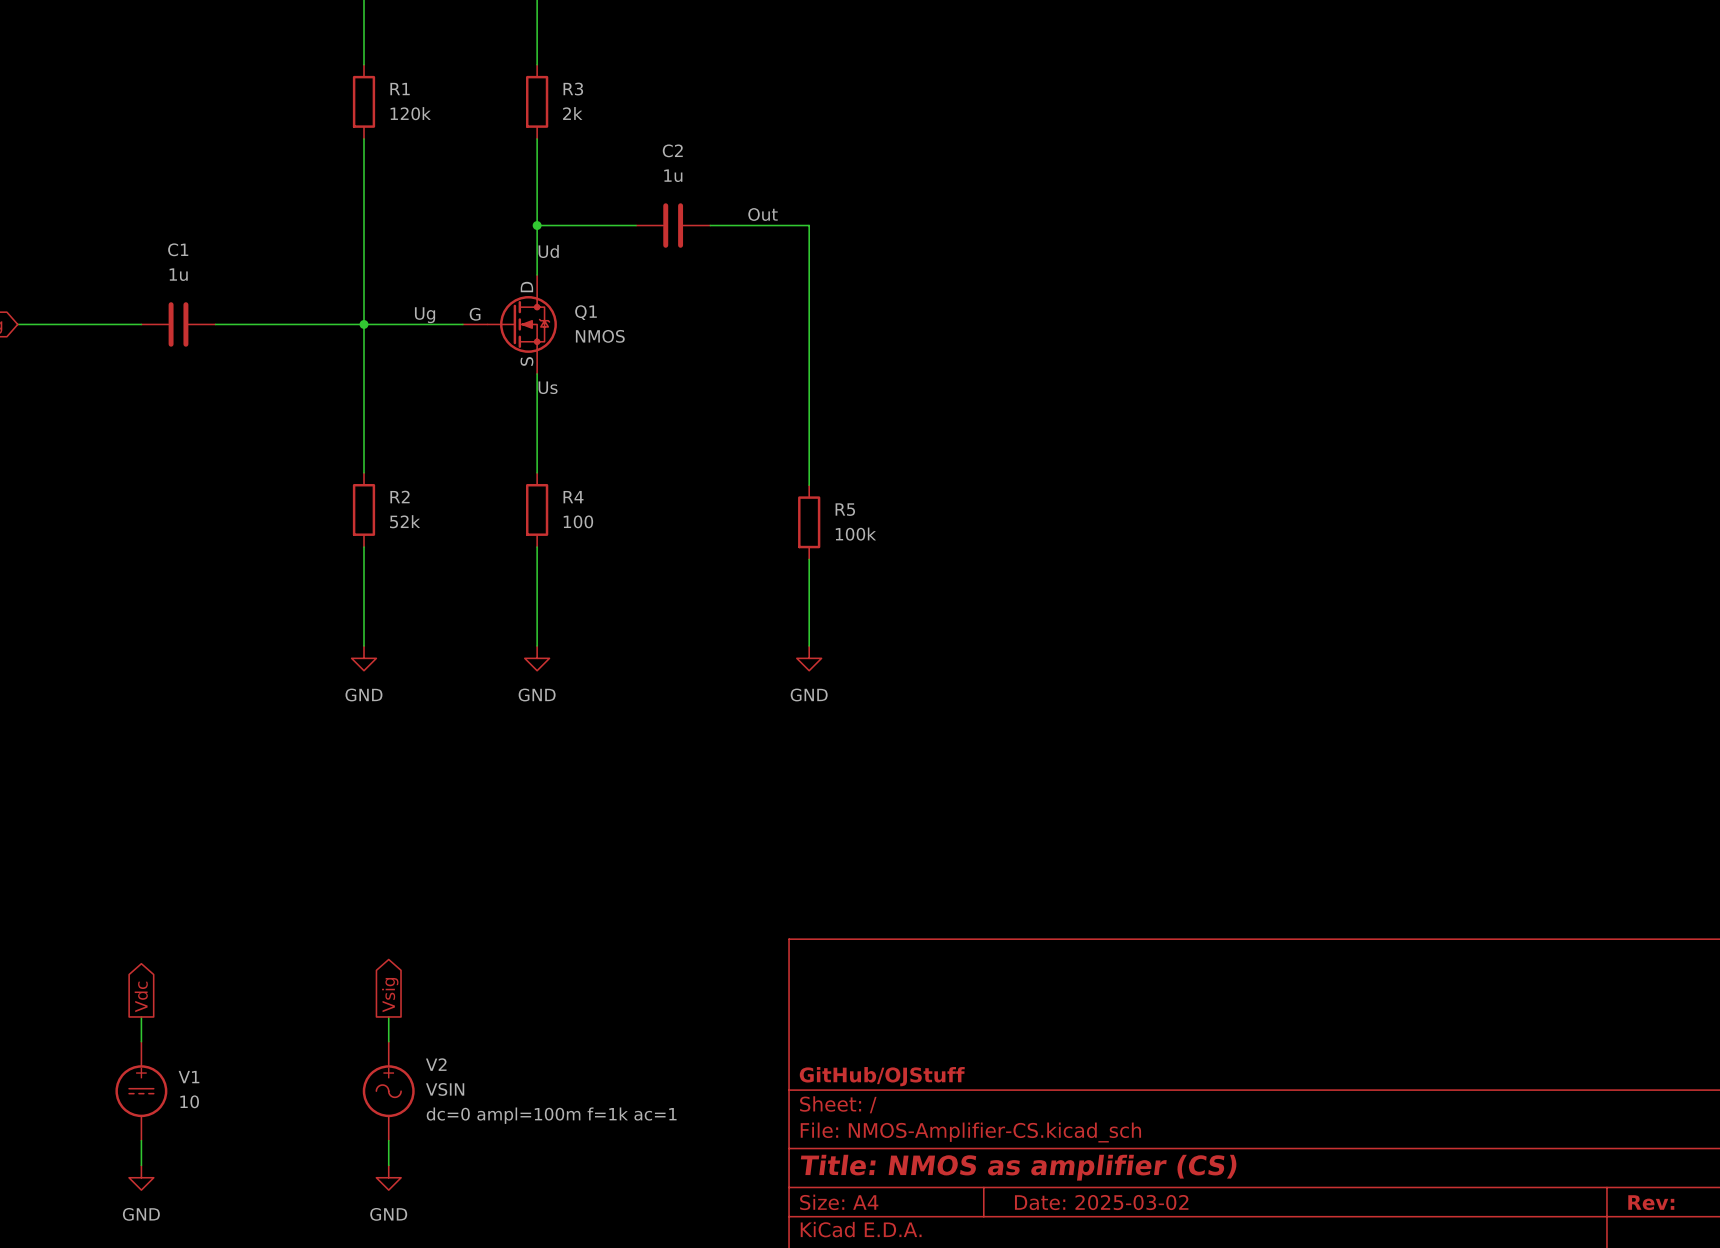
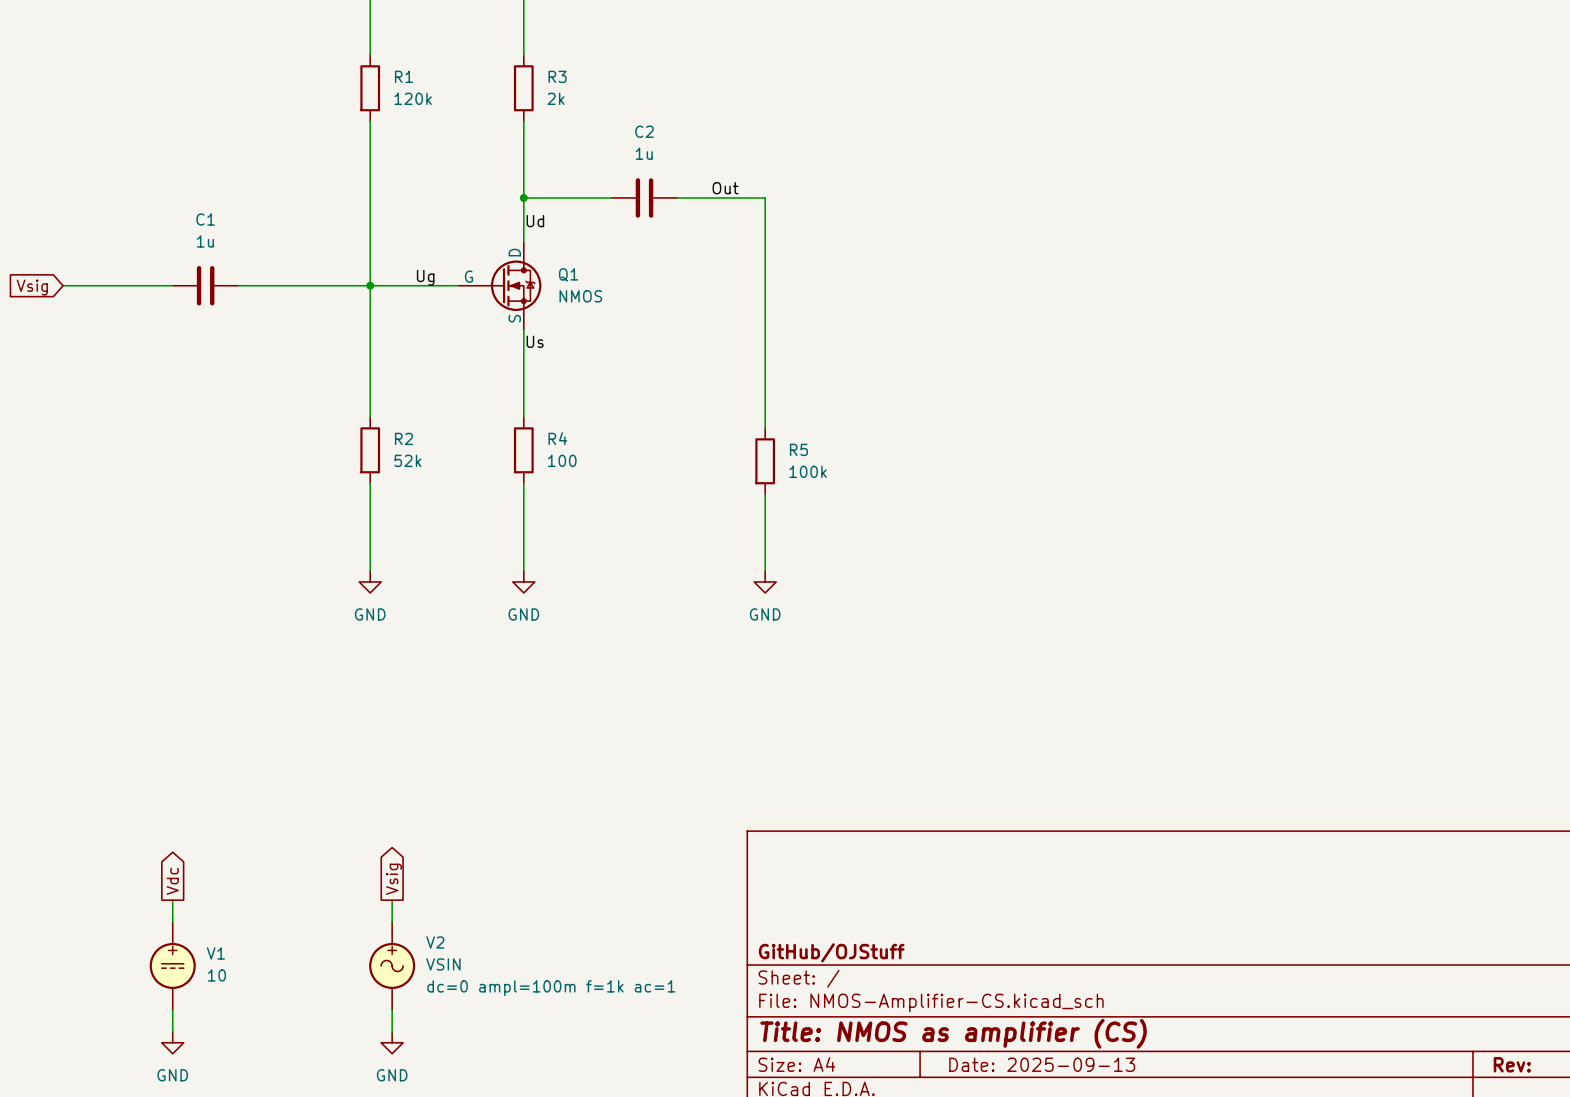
title block: Date: 2025-03-02 (1101, 1202) -> Date: 2025-09-13 (1042, 1064)

